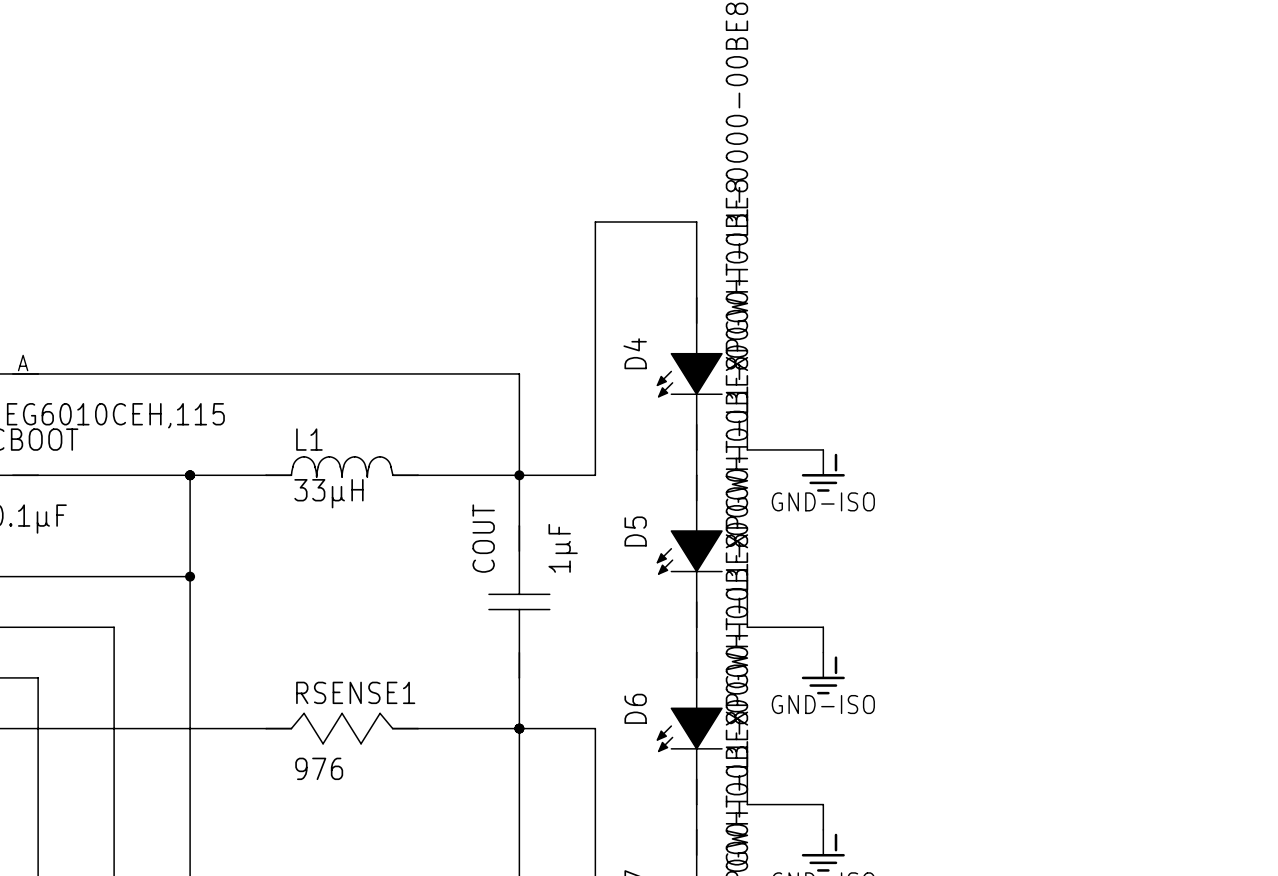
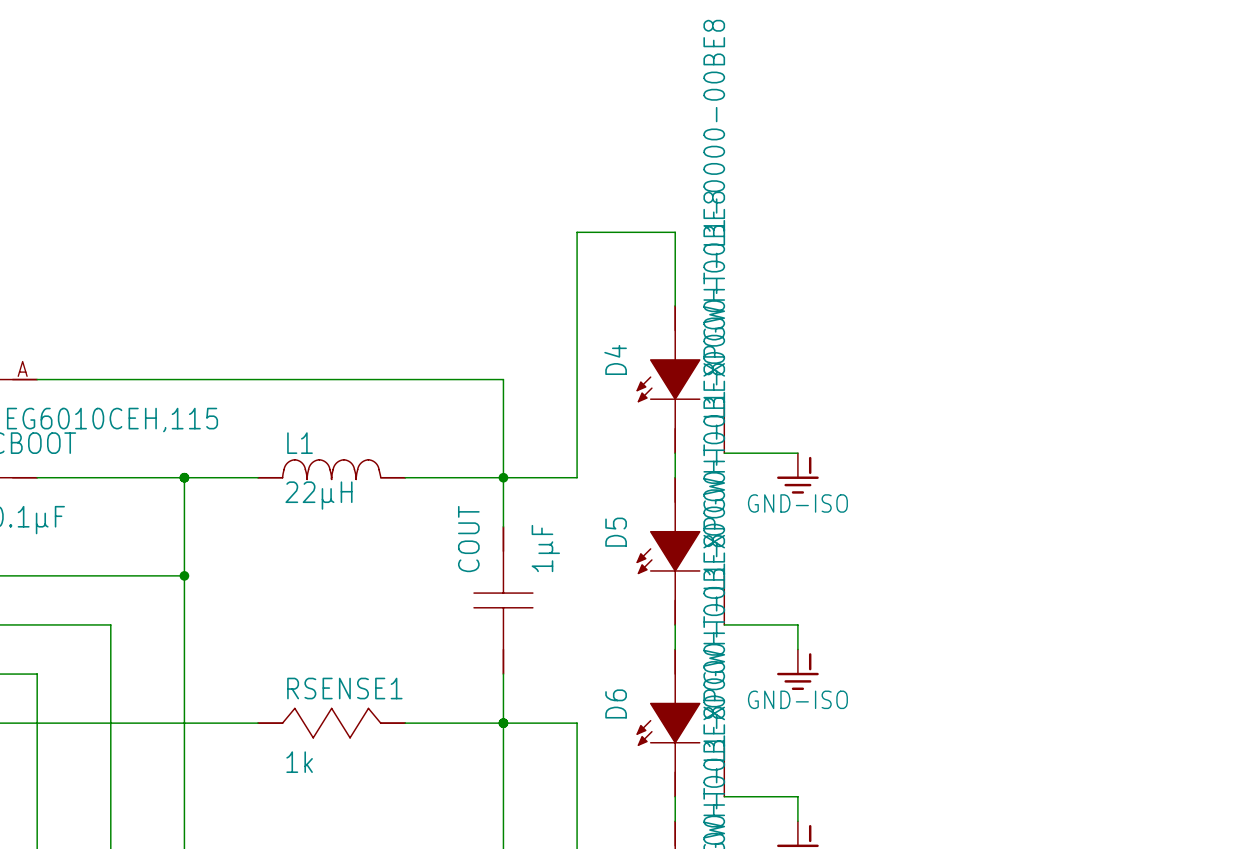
L1 value: 33µH (328, 493) -> 22µH (318, 495)
RSENSE1 value: 976 (319, 768) -> 1k (299, 762)

